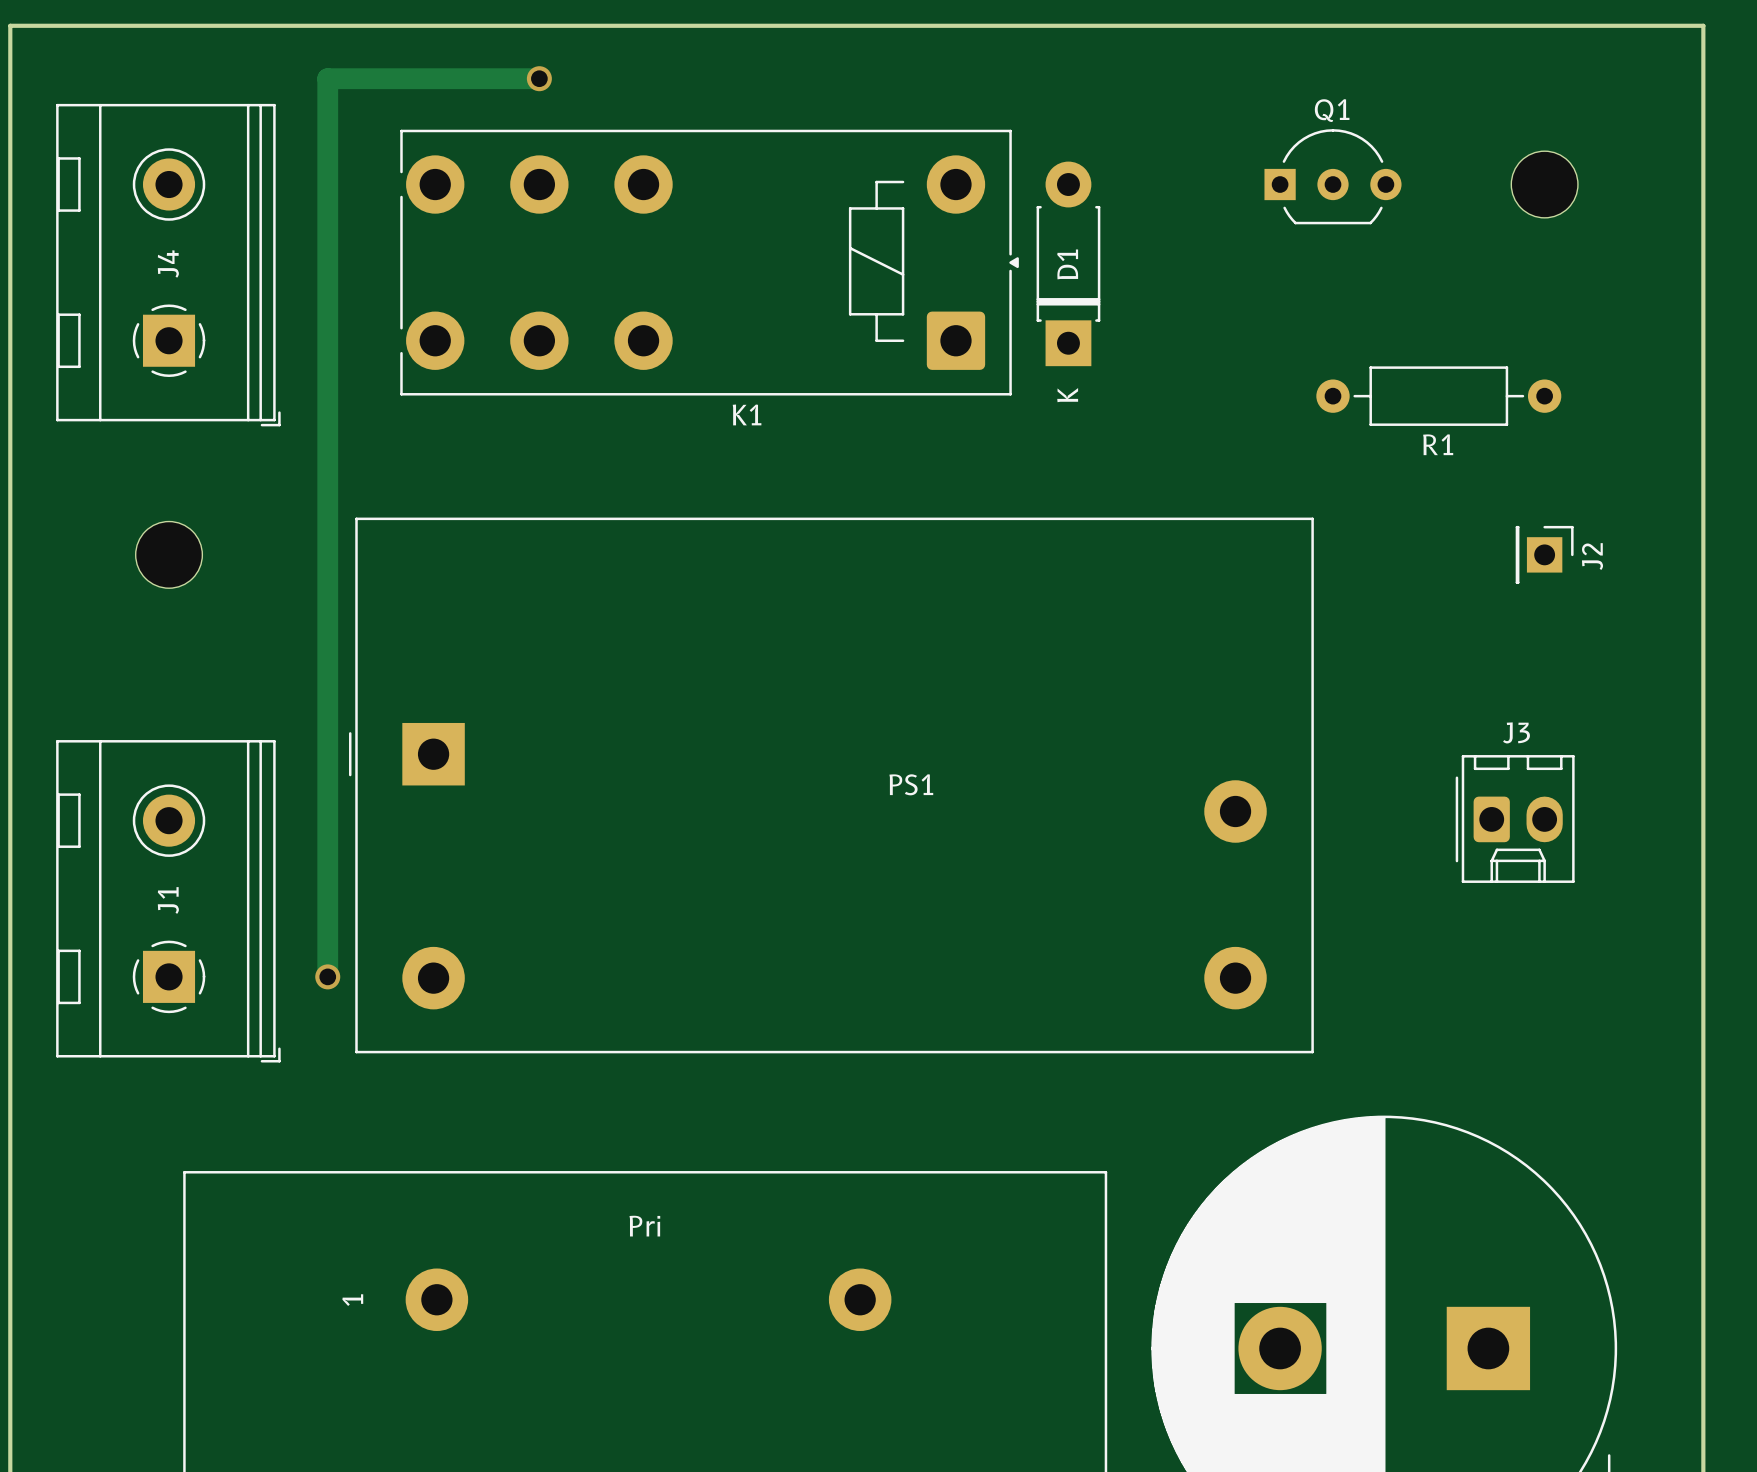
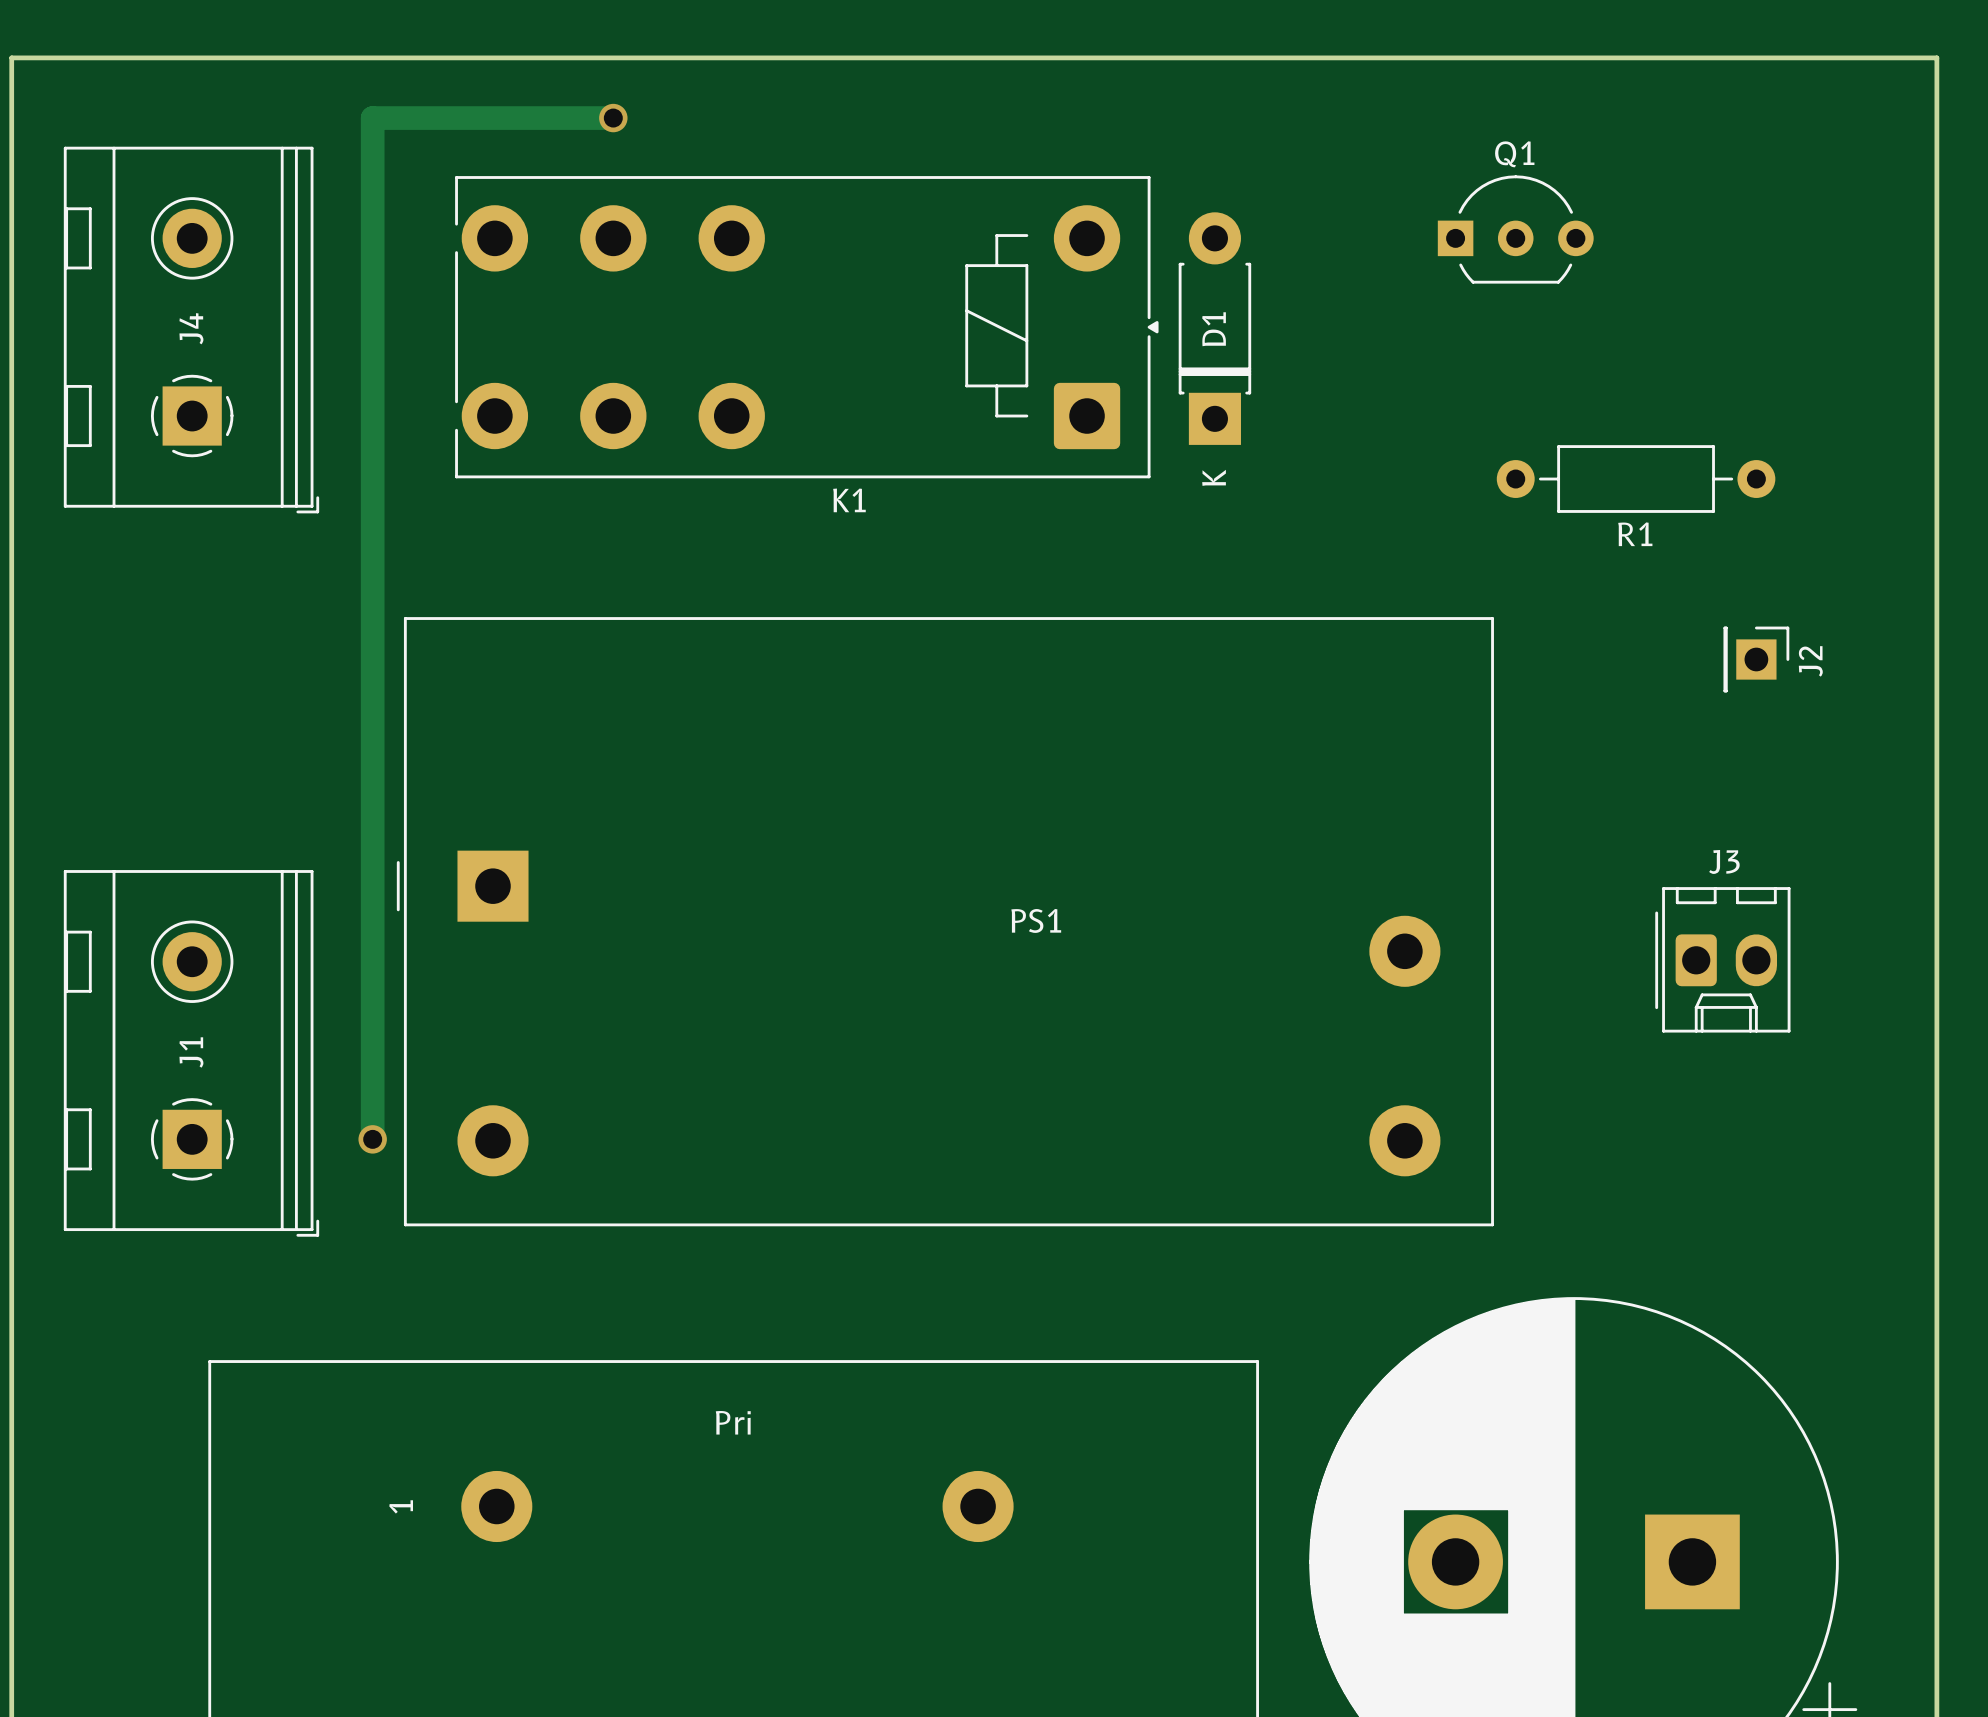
part: (1544, 184) -> none
part: (169, 554) -> none

